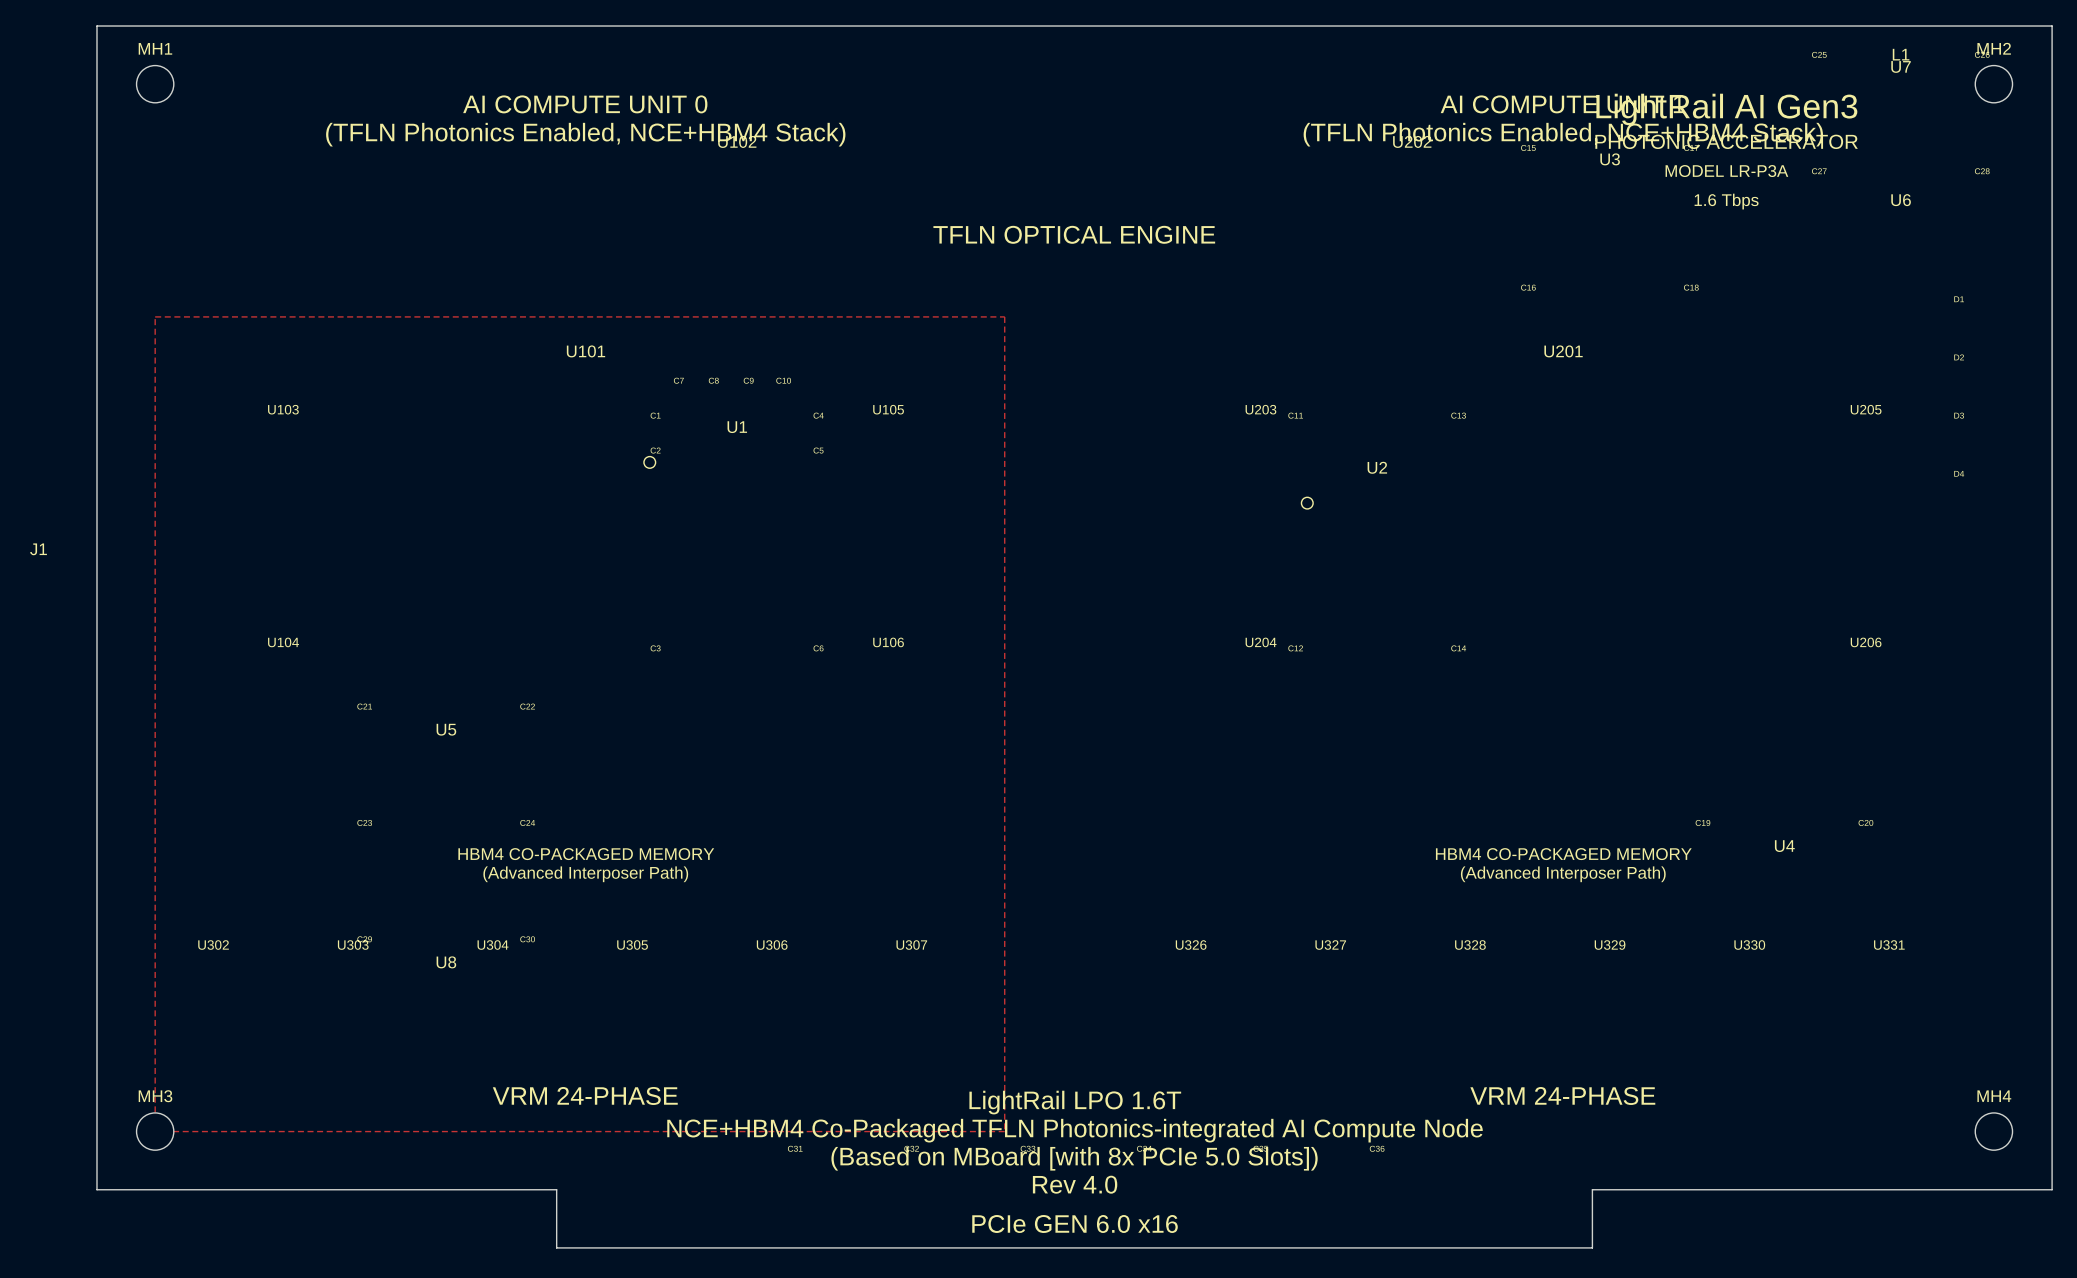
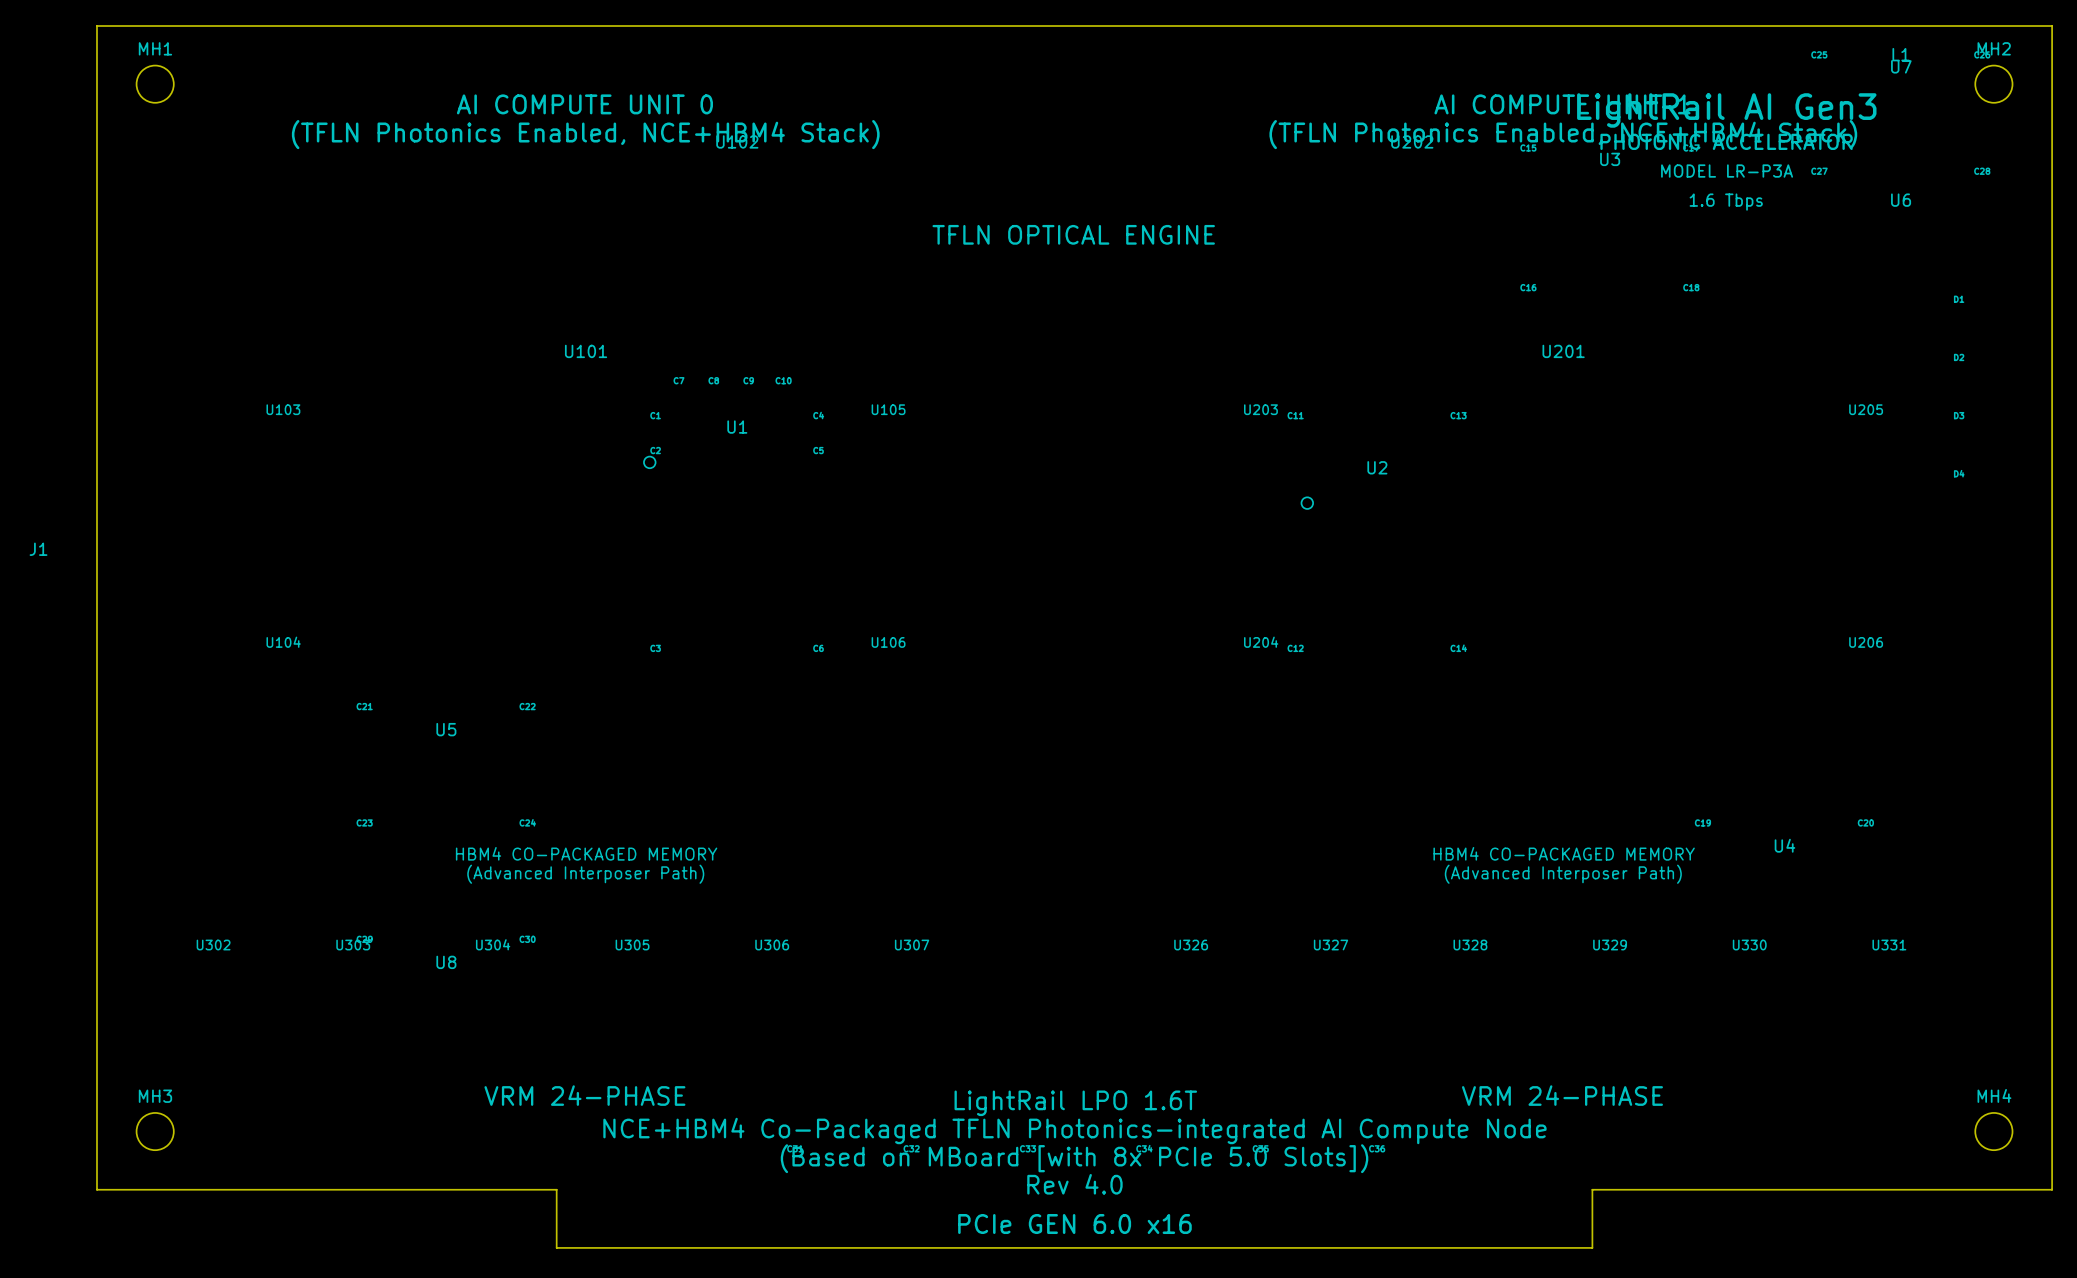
zone outline: (155, 316) (1004, 316) (1004, 1131) (155, 1131) (155, 316) -> none

